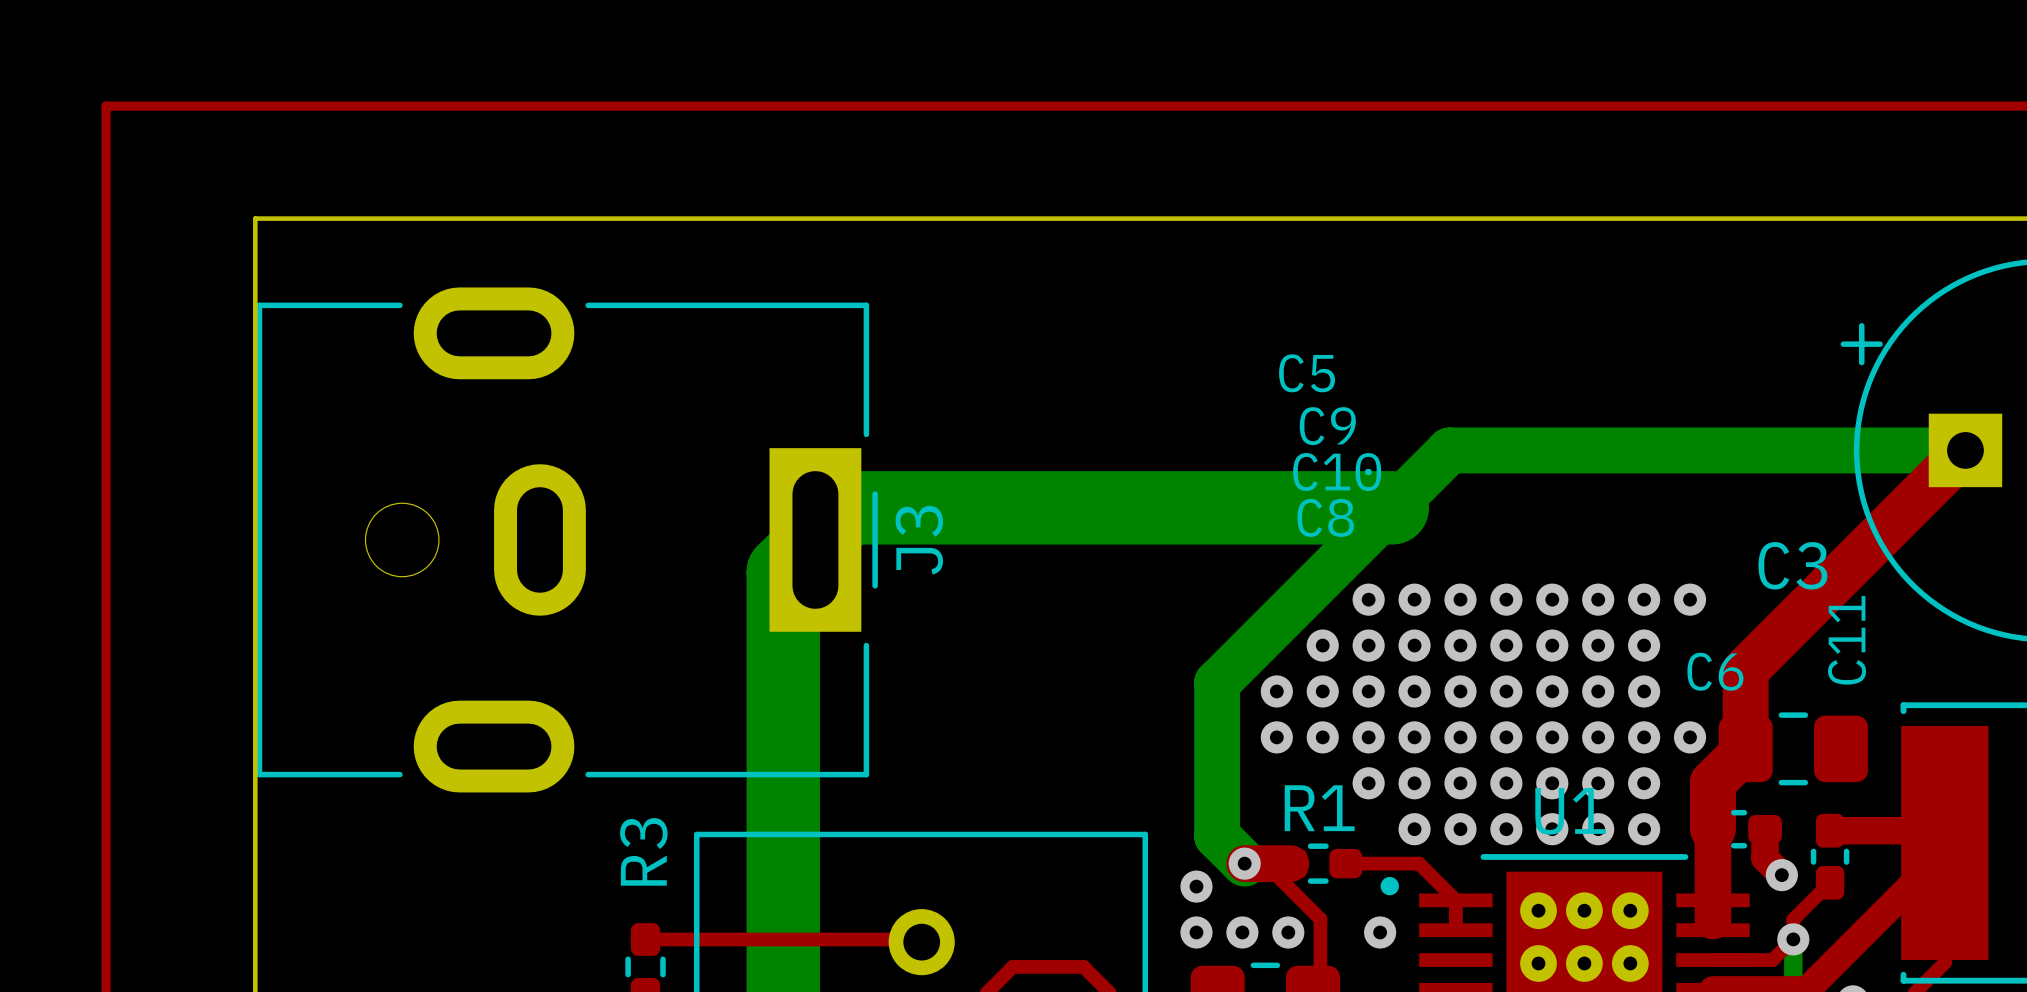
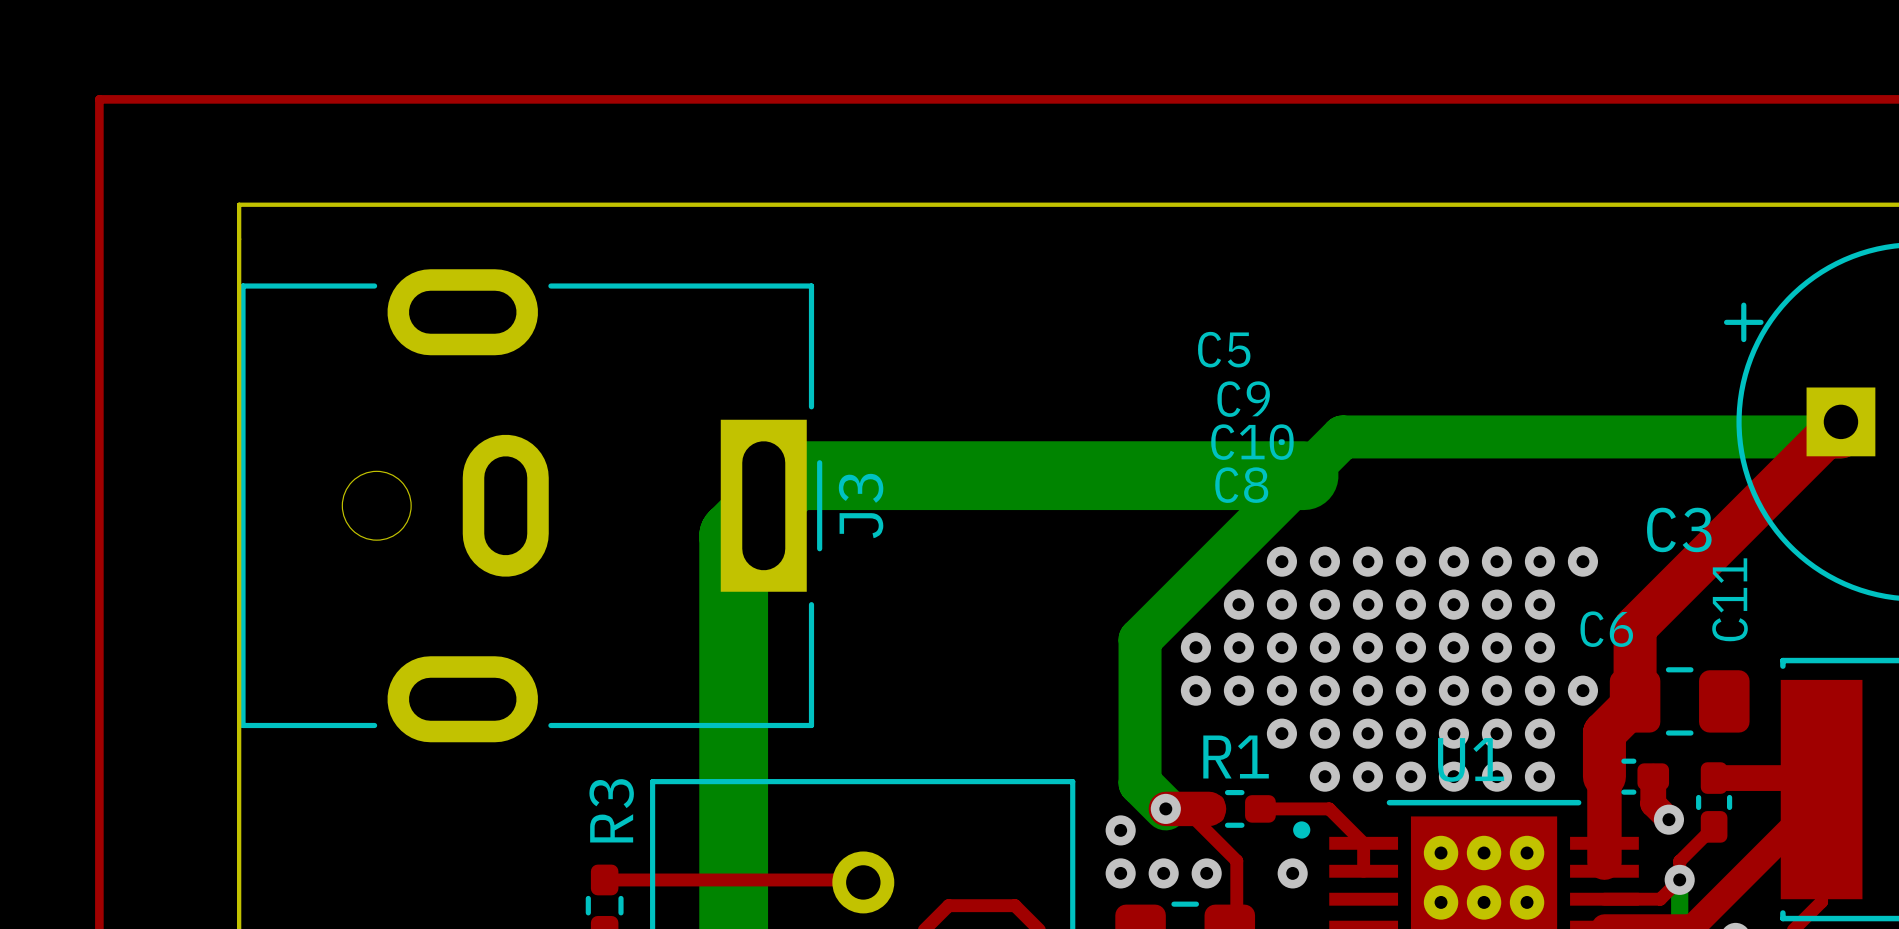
bottom track: (1965, 450) (1449, 450) (1433, 466) -> (1840, 436) (1342, 436)
R3 name position: R3 (643, 851) -> R3 (611, 810)

